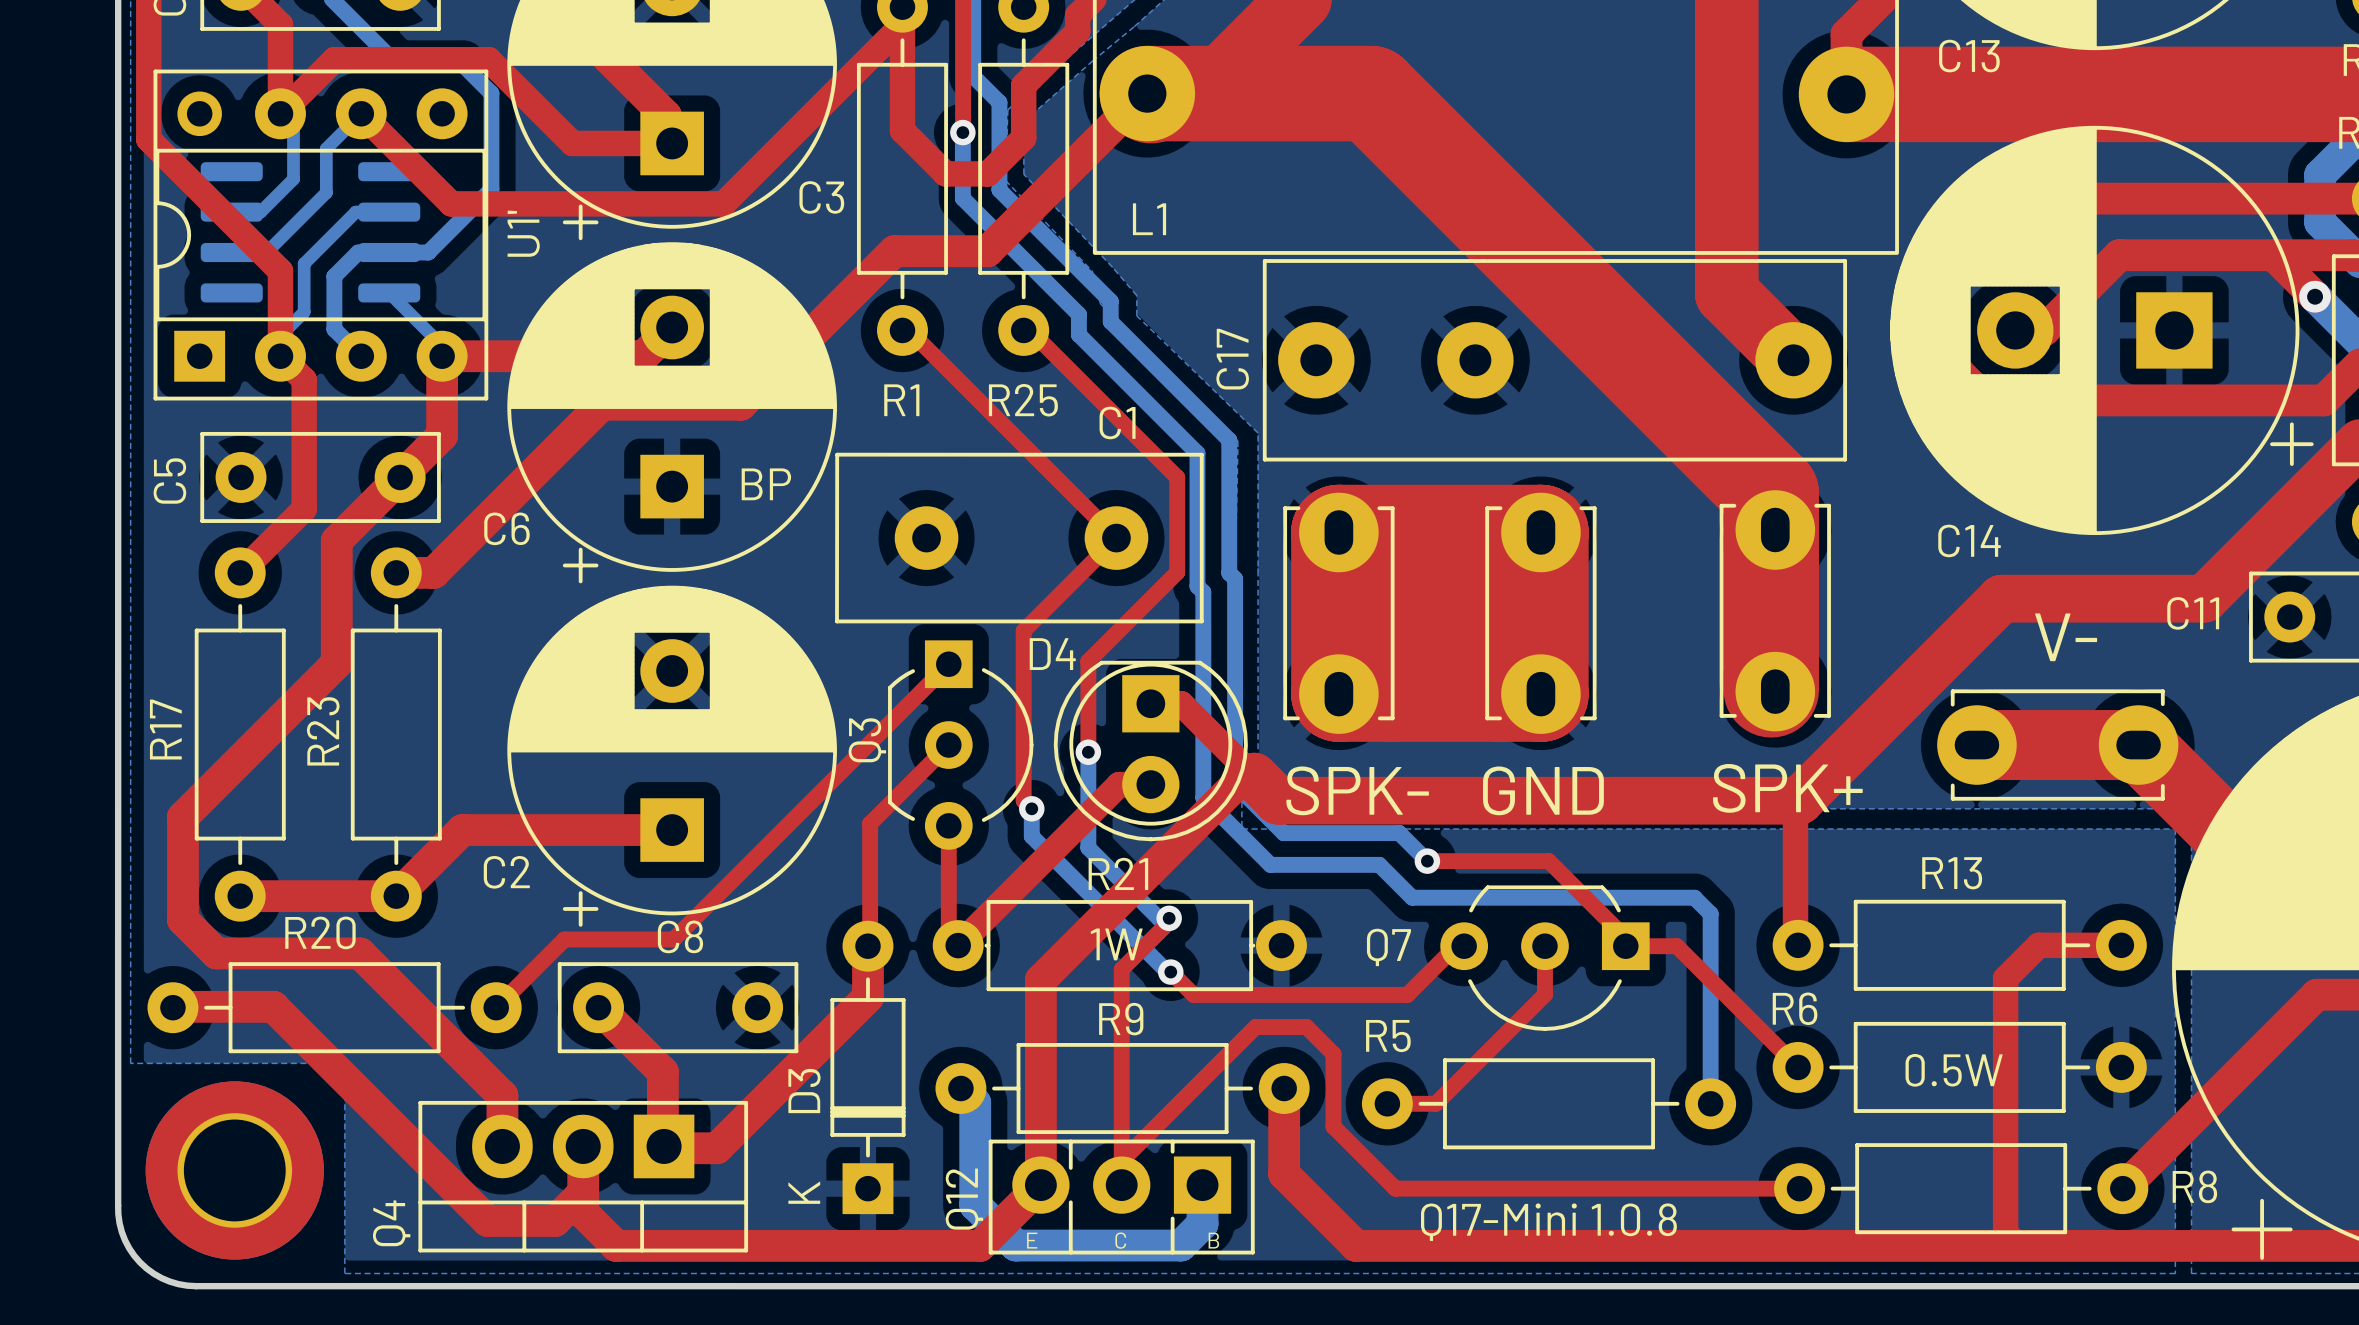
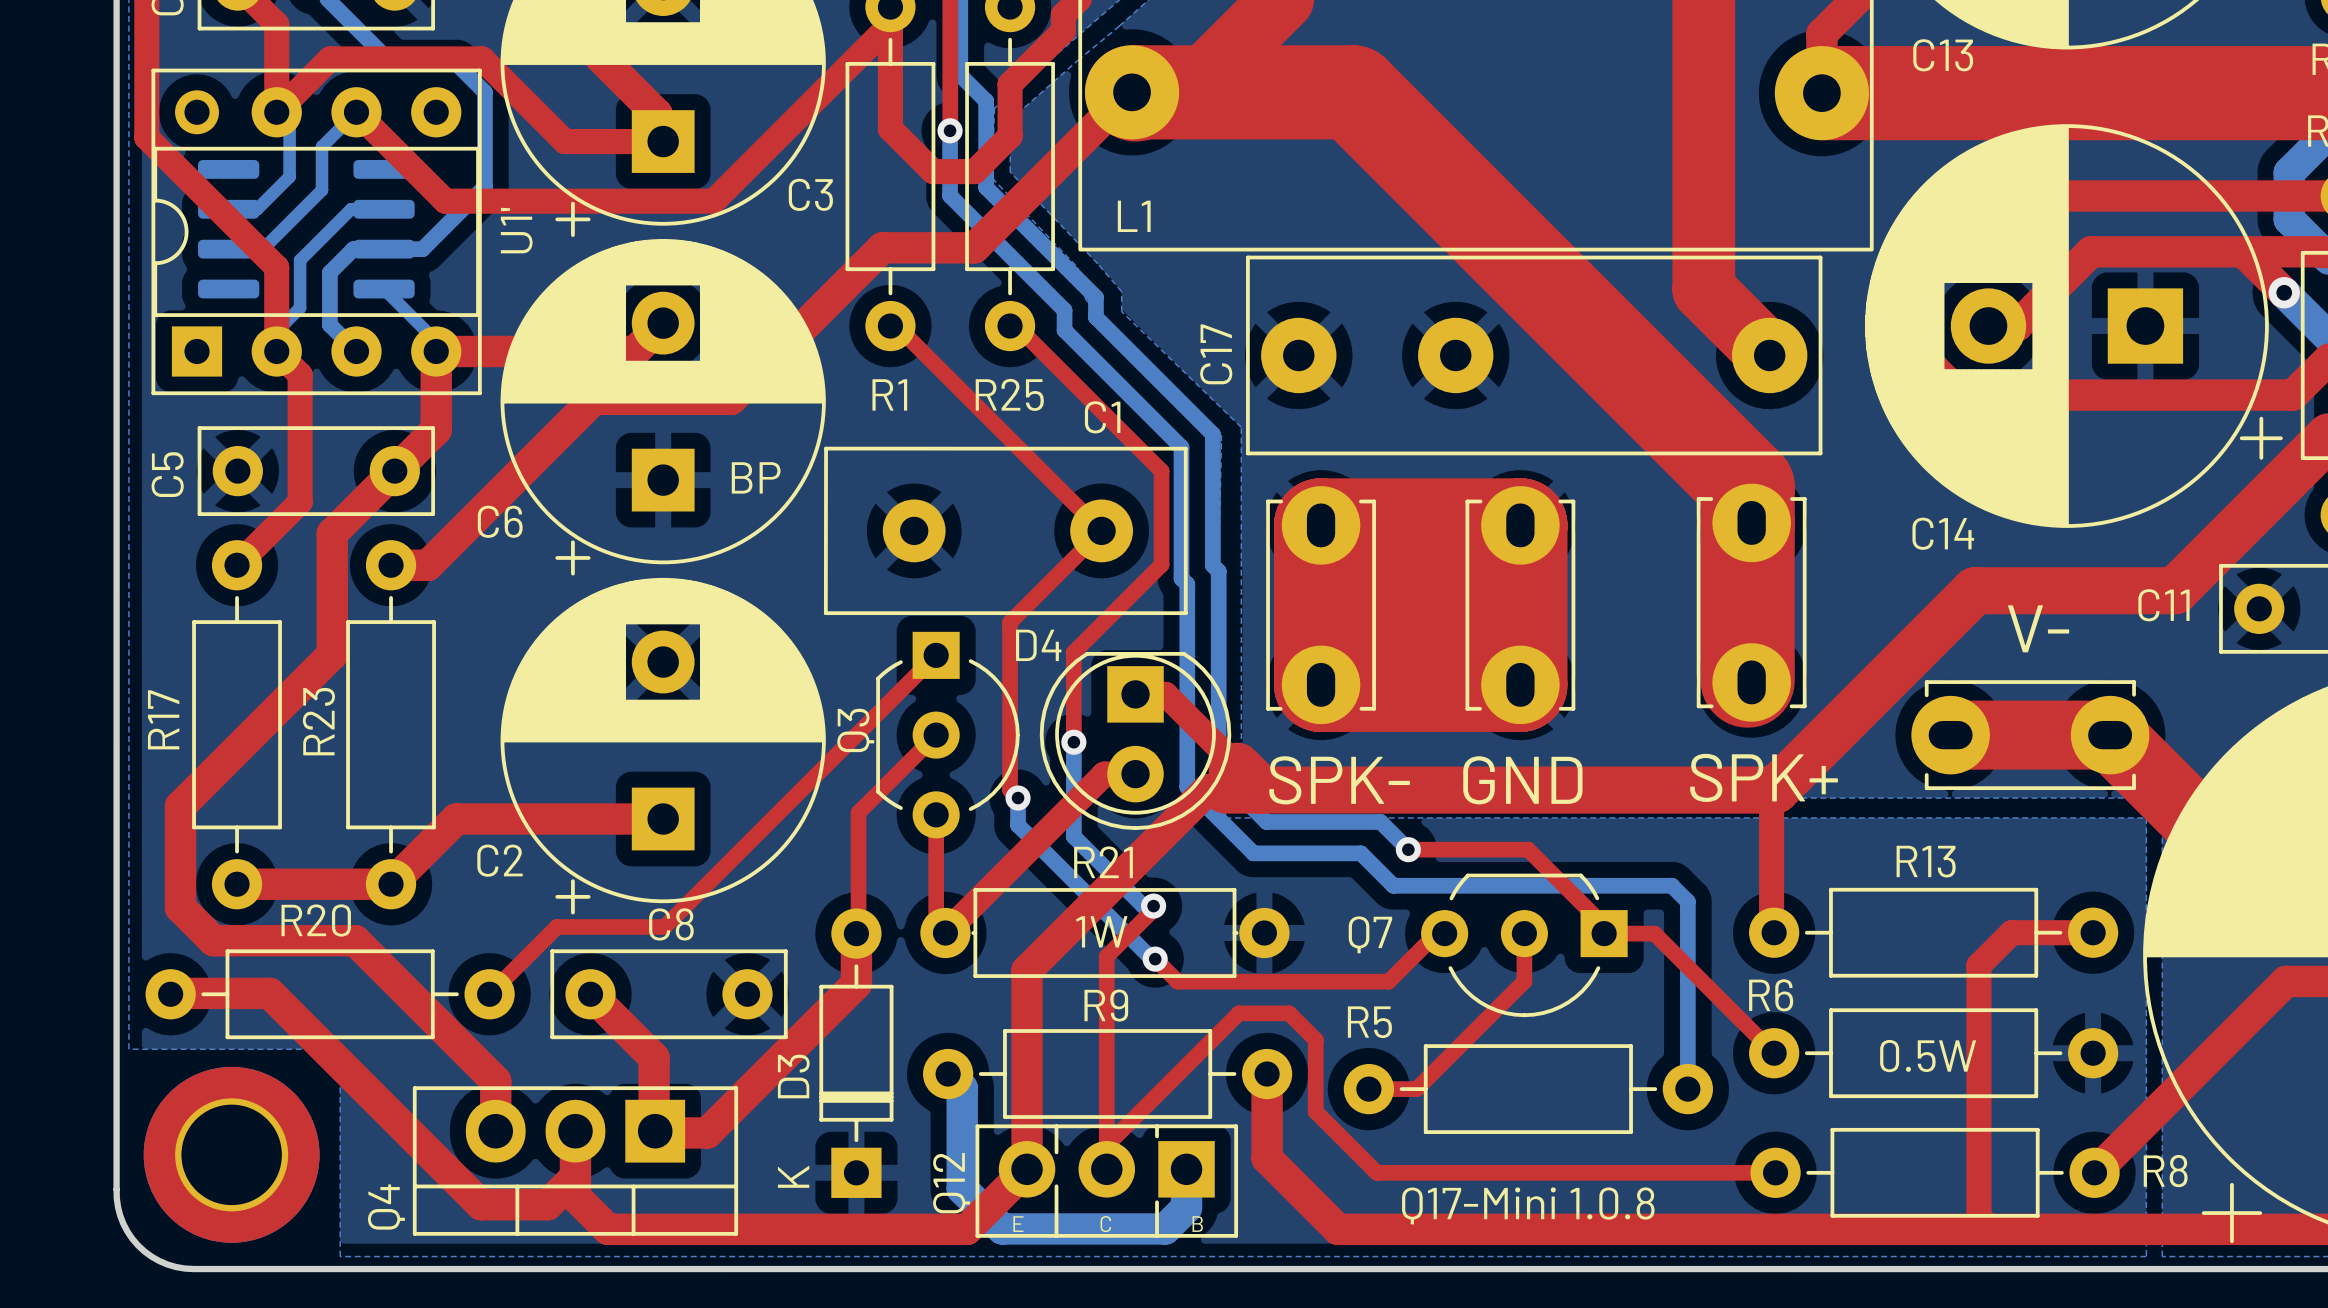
top track: (1237, 783) (1040, 979) (1040, 983) -> (1261, 790) (1207, 790) (1027, 970)

